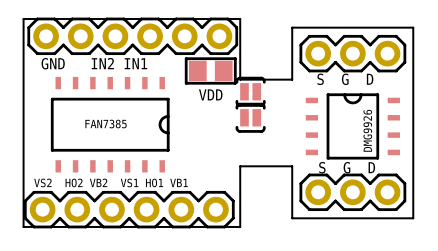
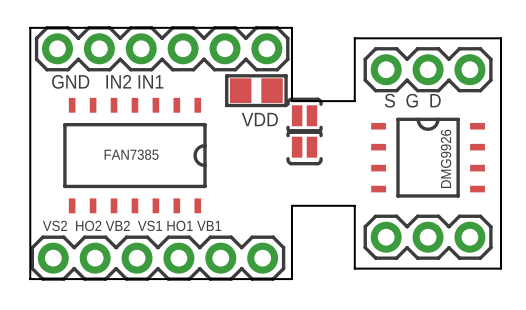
text: S G D (347, 167) -> none

